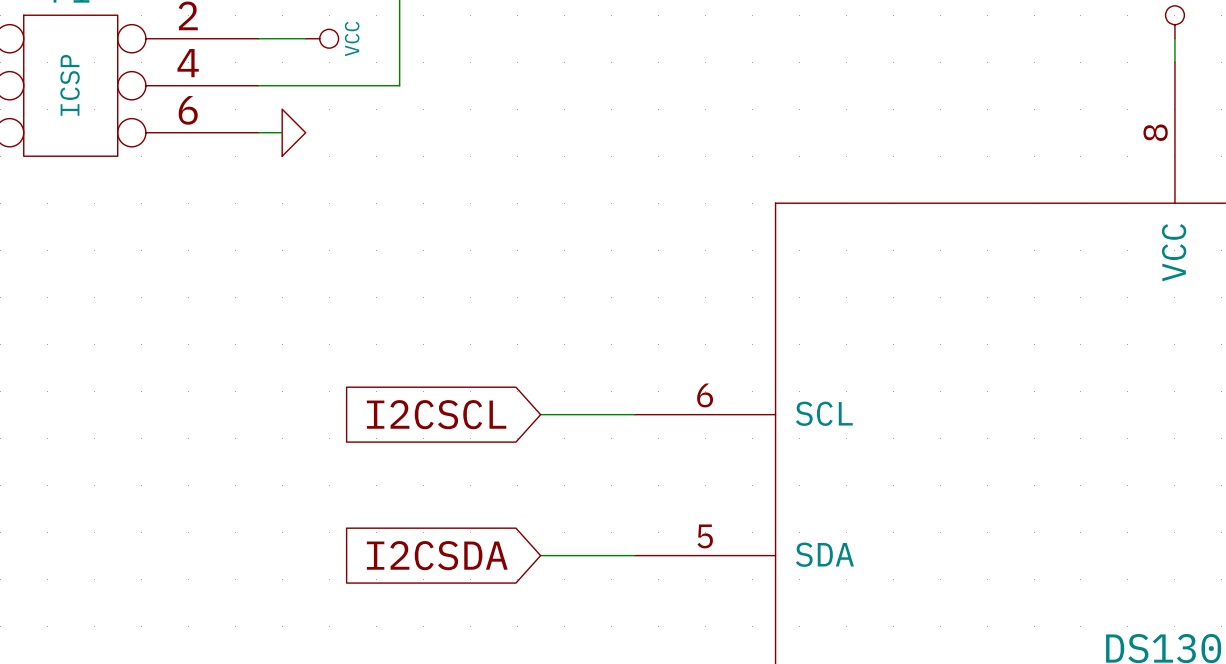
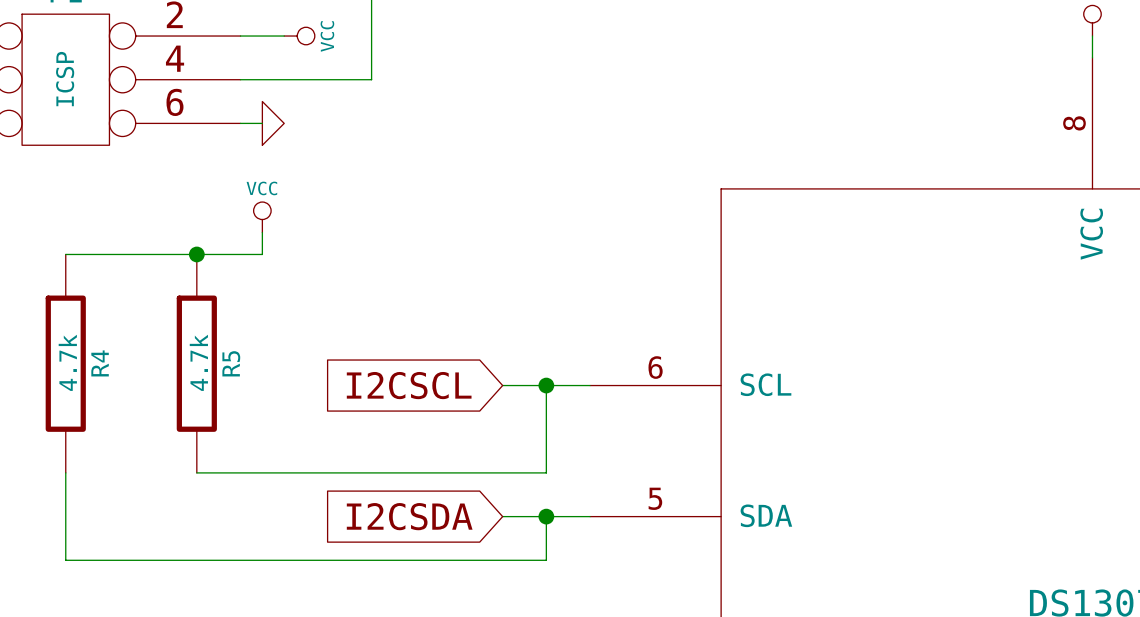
power symbol: none -> VCC (262, 217)
wire: none -> (262, 232) (262, 254) (65, 254)
junction: none -> (196, 254)
R4: none -> 4.7k (65, 363)
R5: none -> 4.7k (196, 363)
wire: none -> (546, 385) (546, 472) (196, 472)
junction: none -> (546, 385)
wire: none -> (65, 472) (65, 560) (546, 560) (546, 516)
junction: none -> (546, 516)

